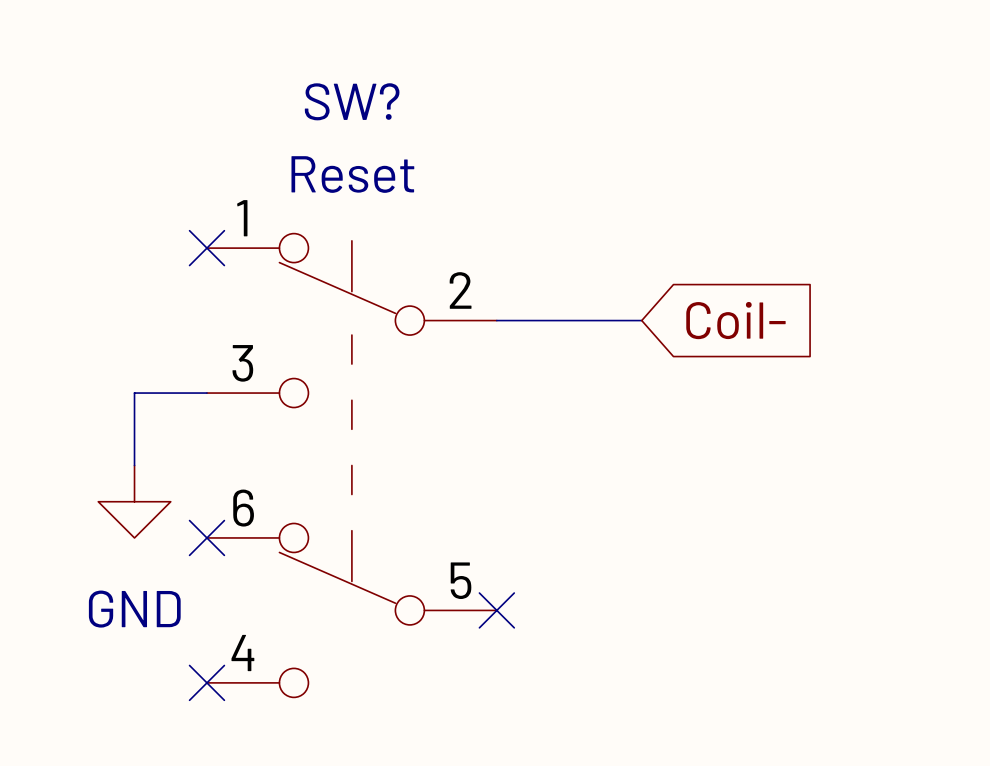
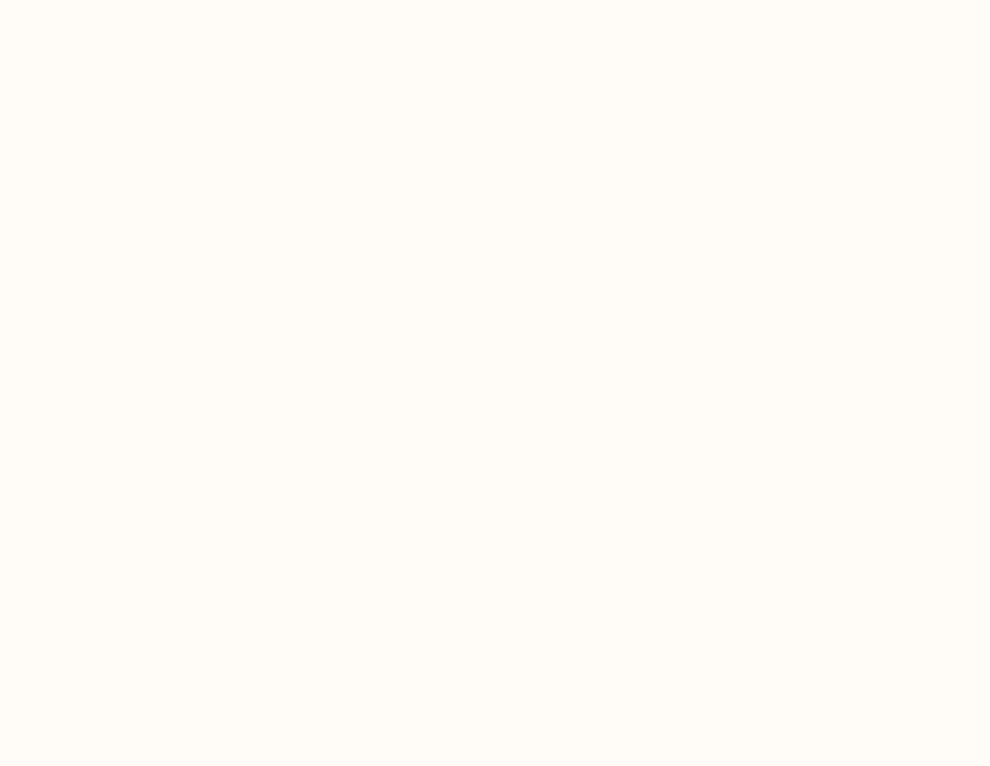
no-connect mark: (206, 248) -> none
wire: (496, 320) (641, 320) -> none
global label: Coil- (735, 320) -> none
wire: (206, 393) (134, 393) (134, 465) -> none
SW?: Reset (351, 465) -> none
power symbol: GND (134, 501) -> none
no-connect mark: (206, 537) -> none
no-connect mark: (496, 610) -> none
no-connect mark: (206, 682) -> none

